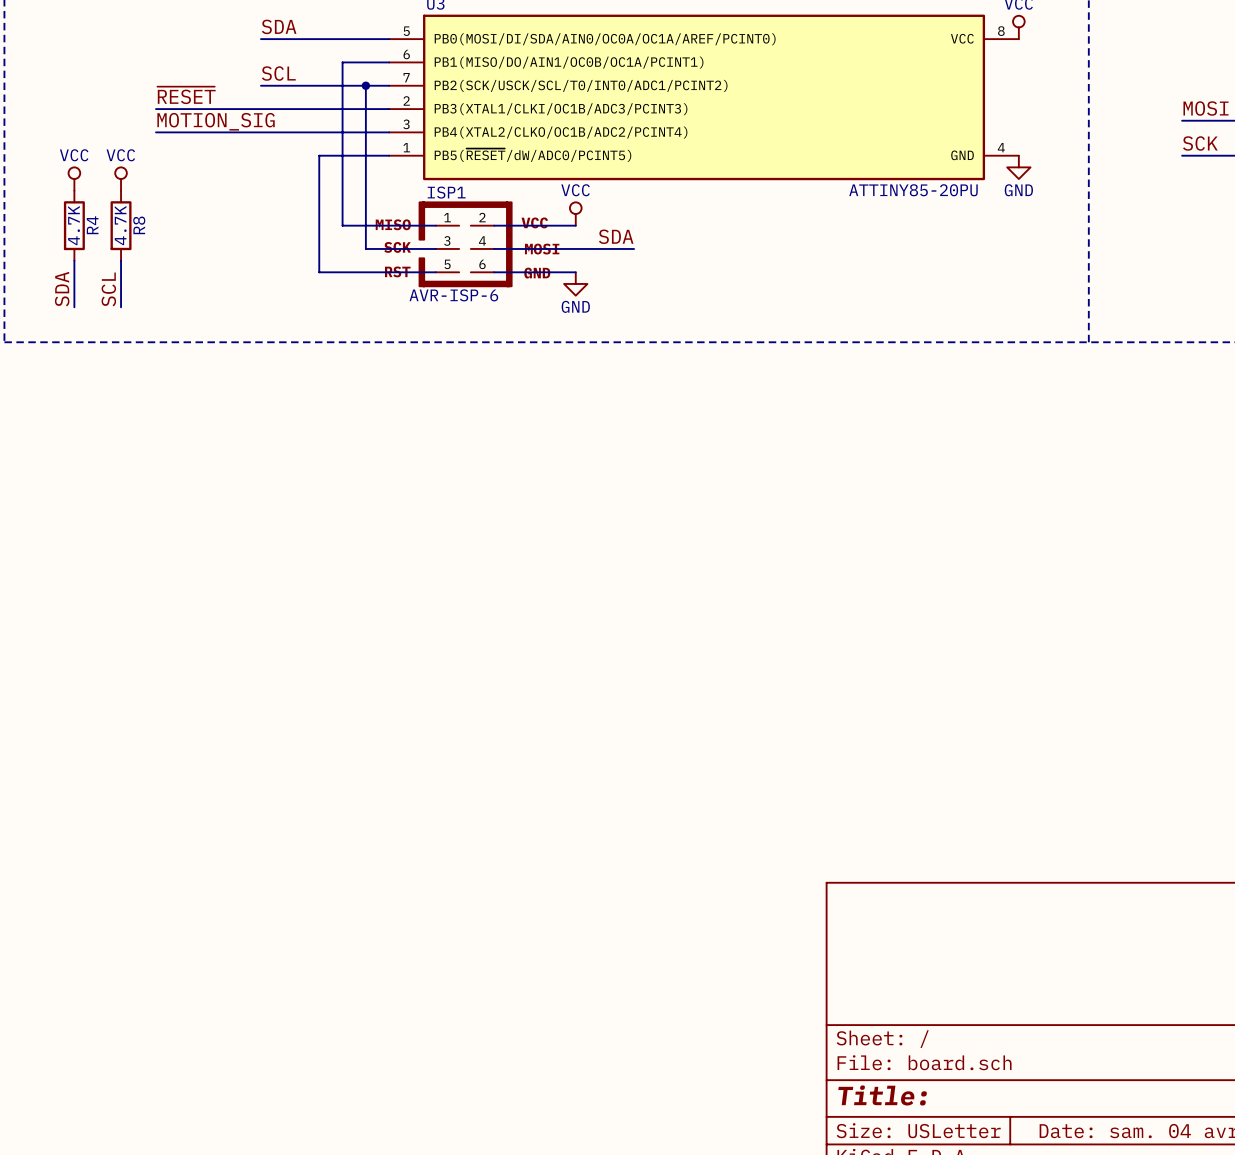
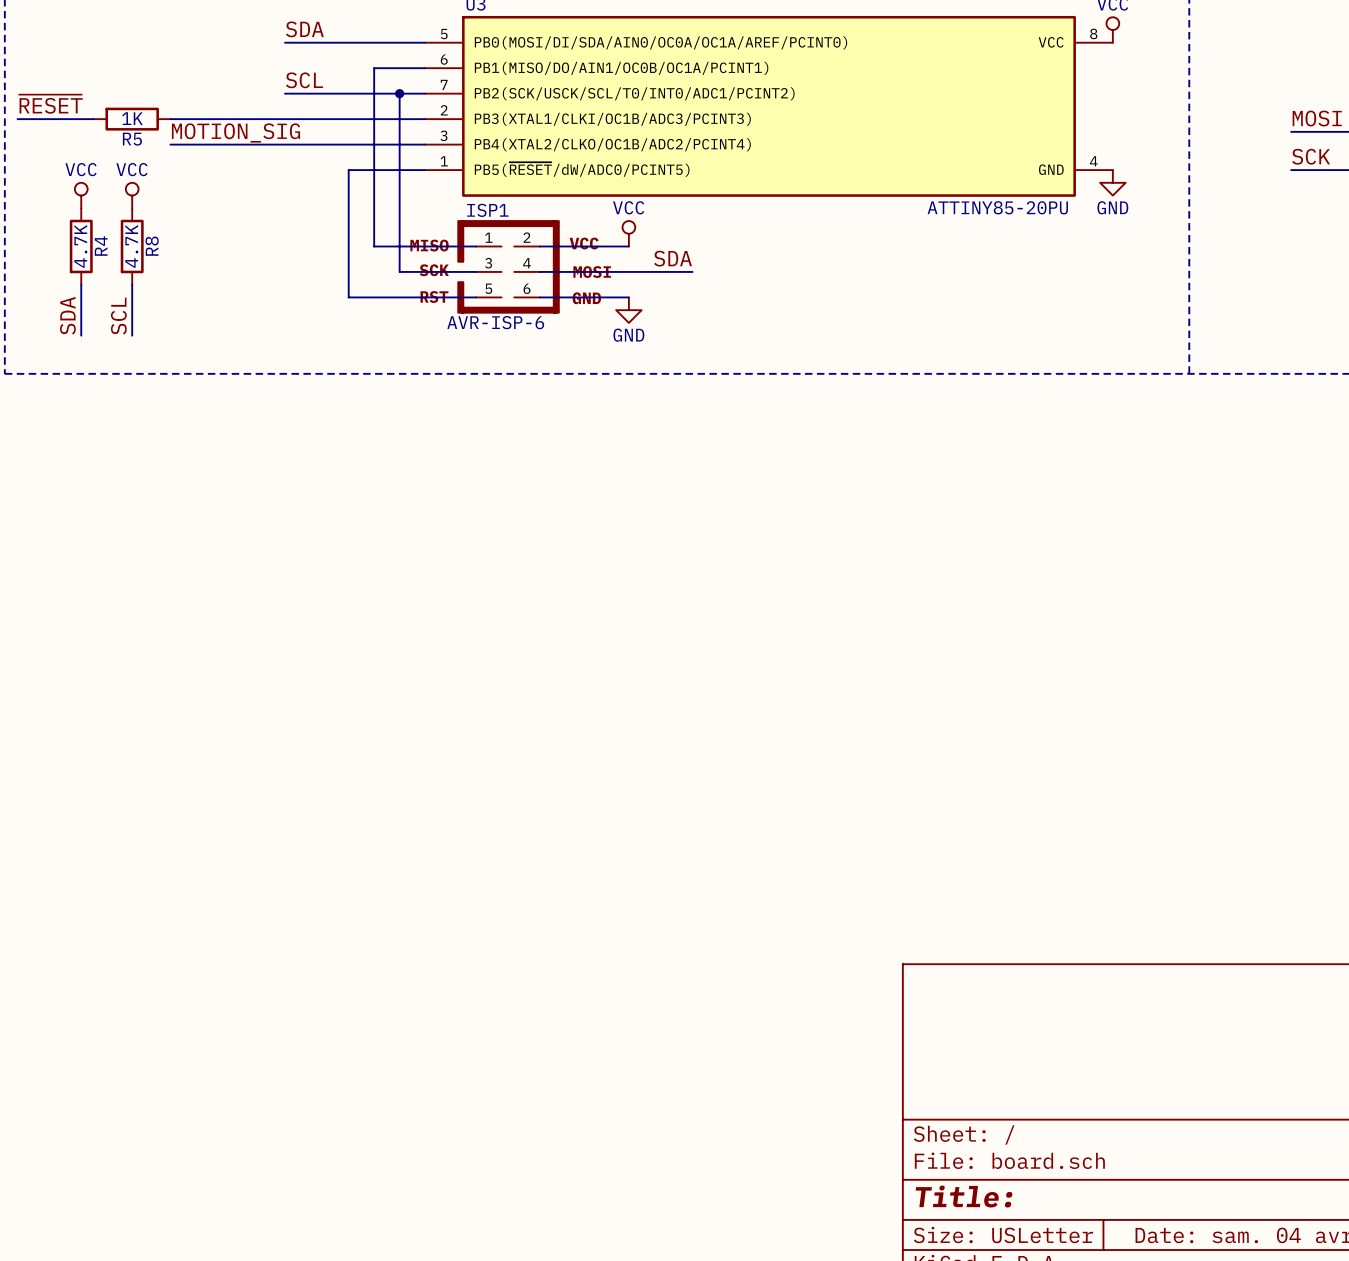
label position: ~{RESET} (186, 95) -> ~{RESET} (50, 104)
wire: none -> (17, 119) (93, 119)
R5: none -> 1K (132, 119)

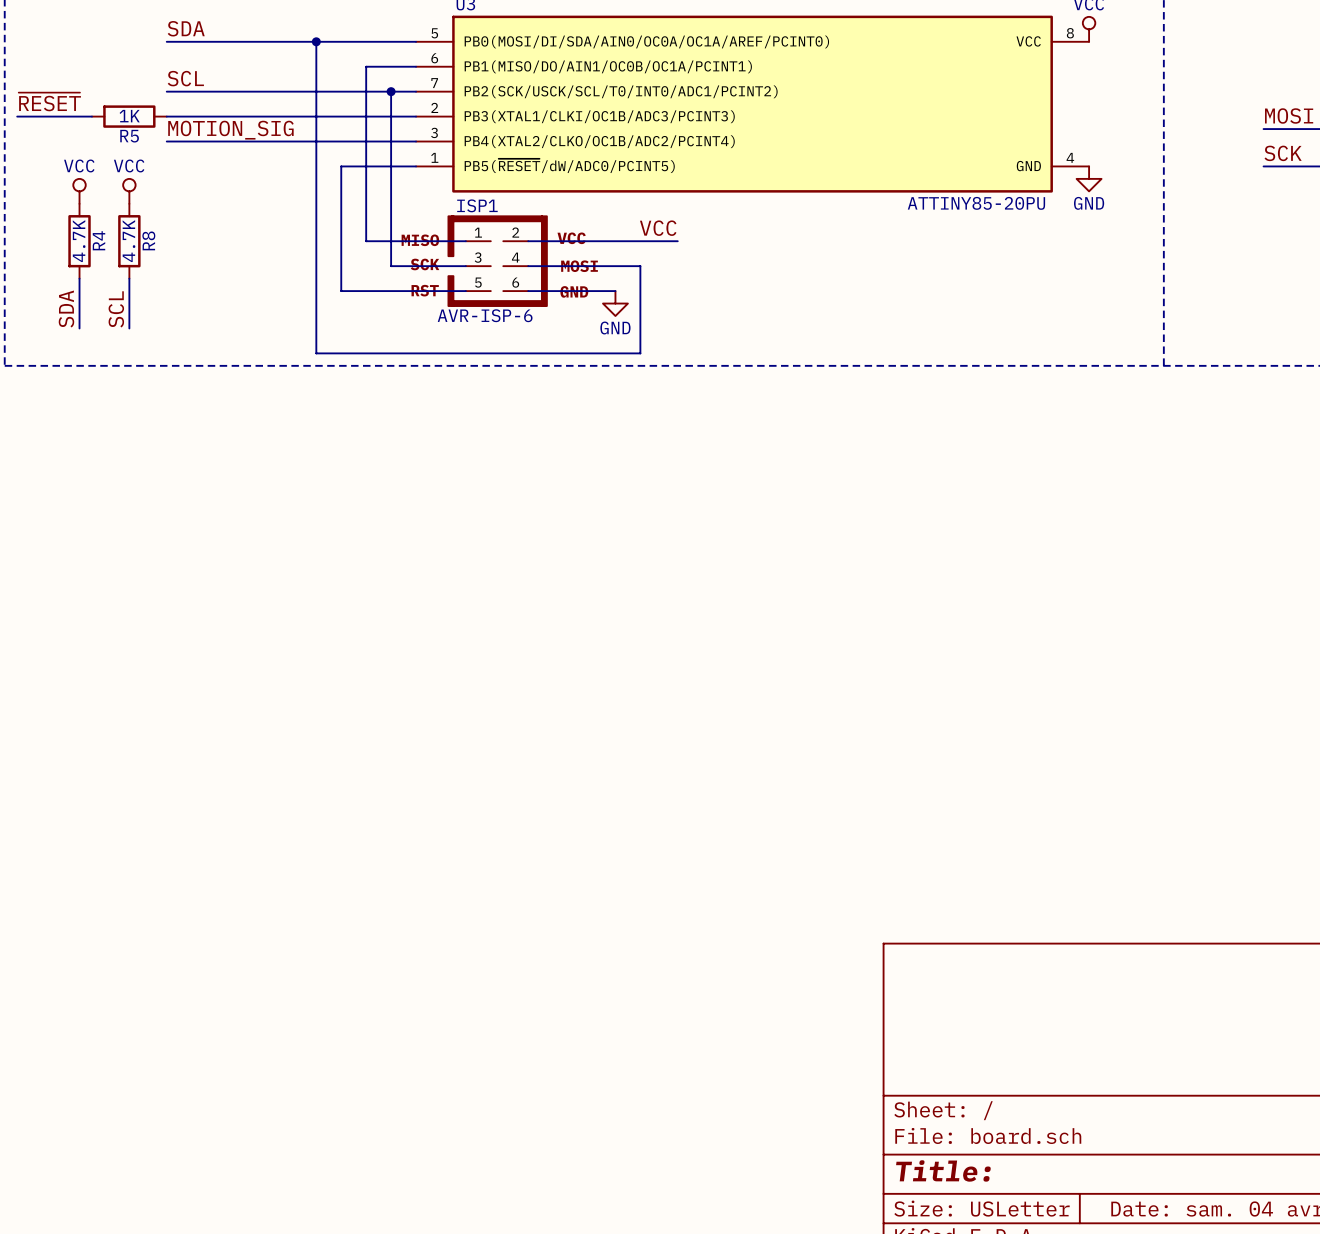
label position: SDA (304, 29) -> SDA (186, 28)
wire: none -> (166, 41) (278, 41)
junction: none -> (316, 41)
label position: SCL (304, 80) -> SCL (185, 78)
wire: none -> (166, 91) (278, 91)
power symbol: VCC (628, 233) -> none
label: none -> VCC (658, 228)
wire: none -> (615, 241) (677, 241)
label: SDA (673, 258) -> none
wire: (654, 271) (692, 271) -> (640, 266) (640, 353) (316, 353) (316, 41)

